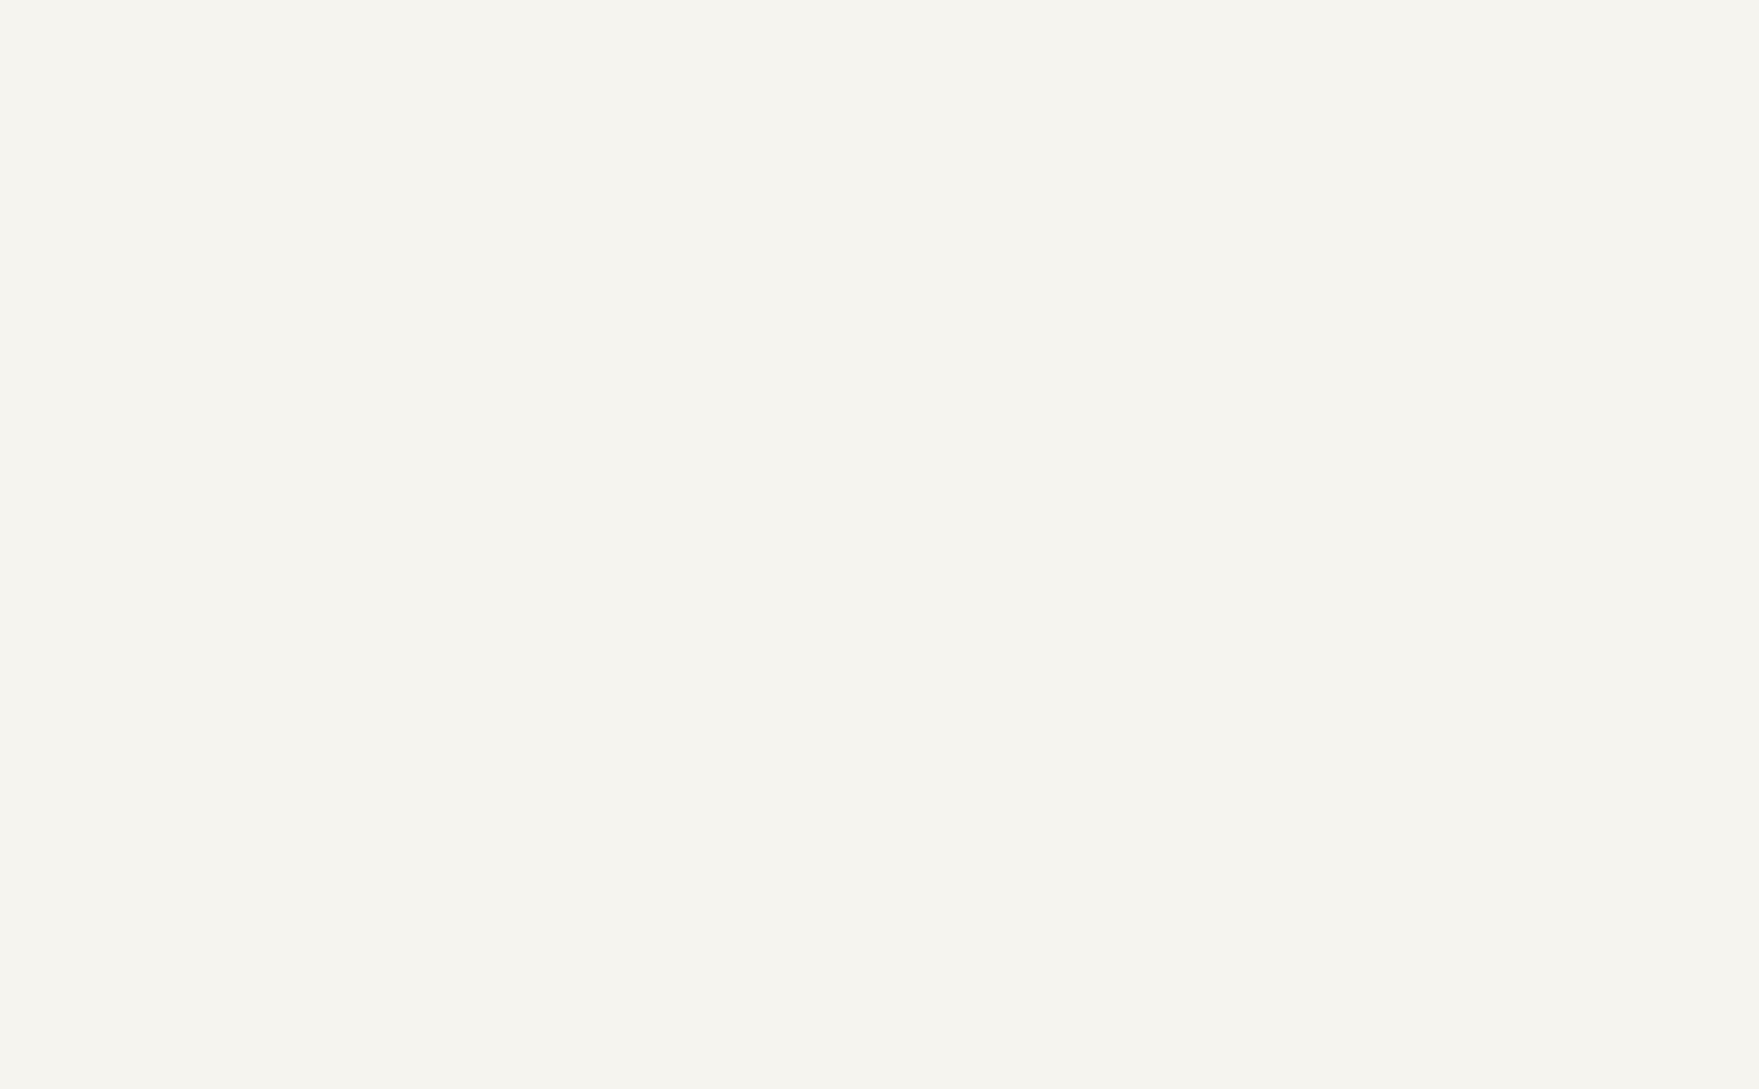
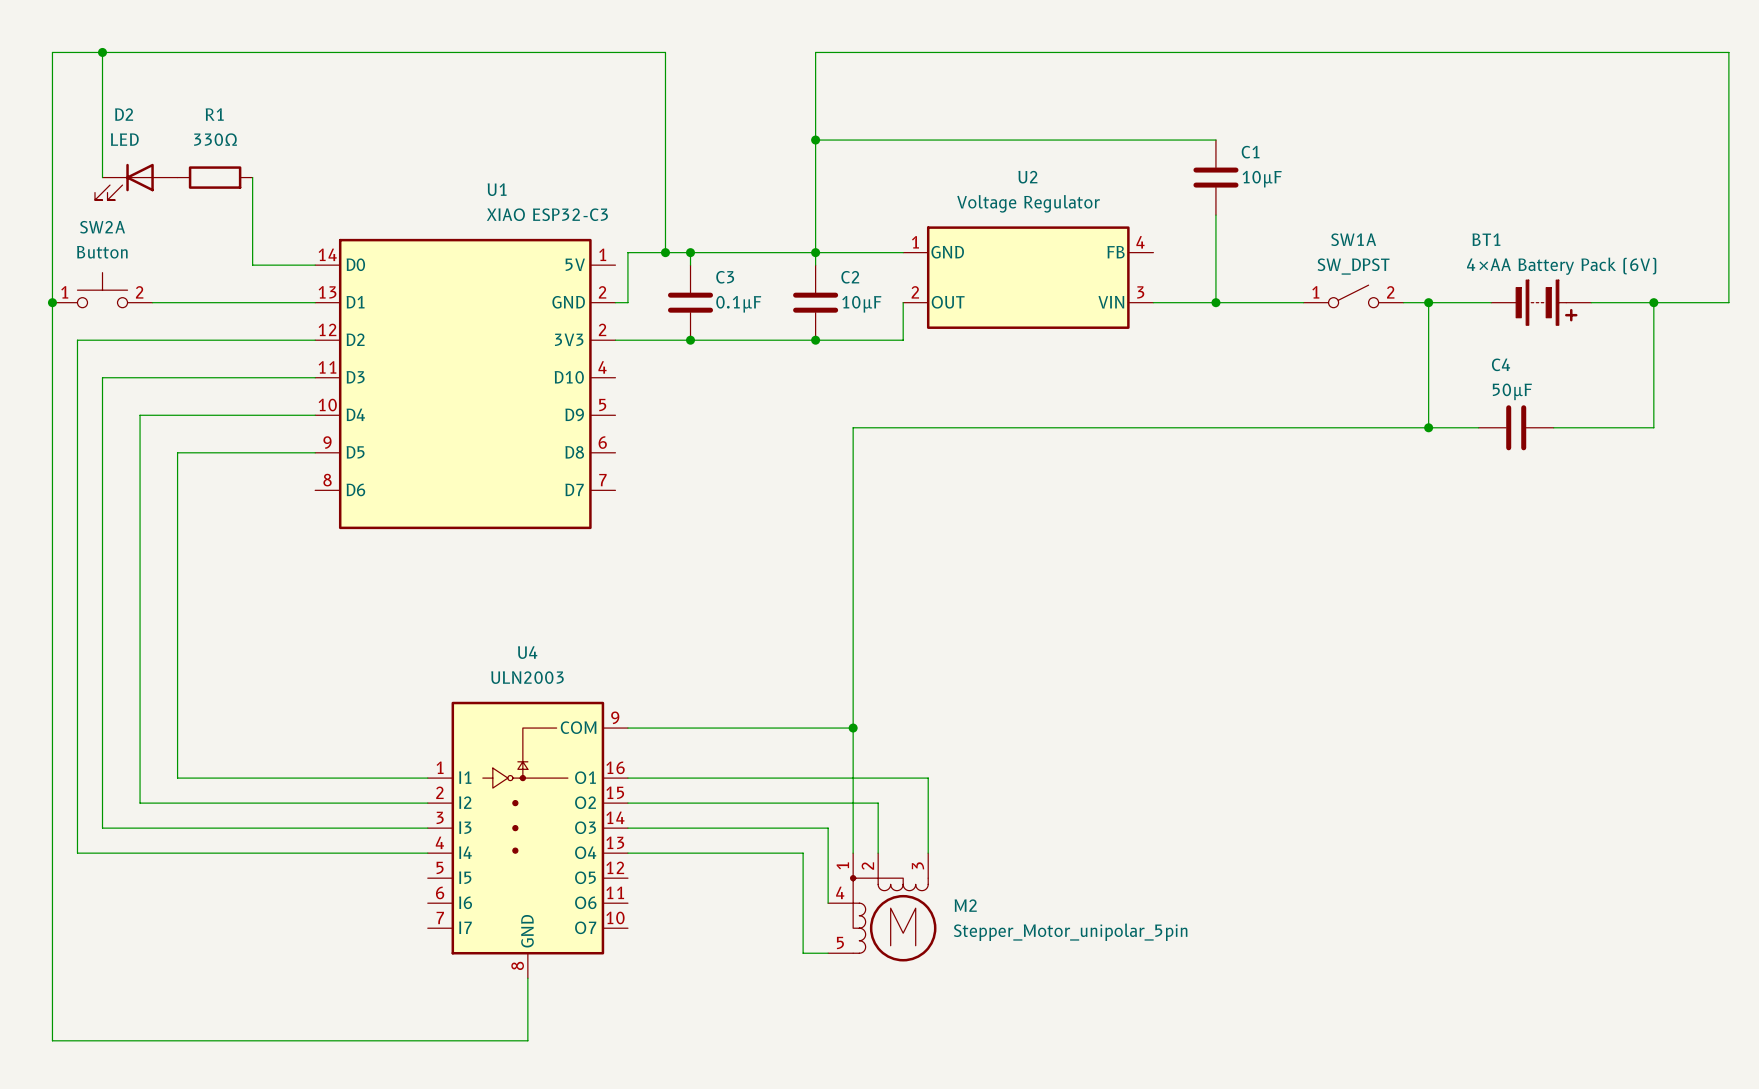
wire: none -> (102, 52) (102, 177)
junction: none -> (102, 52)
wire: none -> (815, 140) (1215, 140)
junction: none -> (815, 140)
R1: none -> 330Ω (215, 177)
wire: none -> (252, 177) (252, 265) (315, 265)
C1: none -> 10µF (1215, 177)
D2: none -> LED (136, 181)
wire: none -> (1215, 215) (1215, 302)
wire: none -> (665, 252) (665, 52) (52, 52) (52, 1040) (527, 1040) (527, 978)
junction: none -> (665, 252)
wire: none -> (690, 252) (690, 265)
junction: none -> (690, 252)
junction: none -> (815, 252)
wire: none -> (903, 252) (627, 252) (627, 302) (615, 302)
wire: none -> (815, 265) (815, 52) (1728, 52) (1728, 302) (1591, 302)
U2: none -> Voltage Regulator (1028, 277)
SW2A: none -> Button (102, 290)
SW1A: none -> SW_DPST (1353, 296)
junction: none -> (52, 302)
wire: none -> (152, 302) (315, 302)
C3: none -> 0.1µF (690, 302)
C2: none -> 10µF (815, 302)
wire: none -> (903, 302) (903, 340) (615, 340)
wire: none -> (1153, 302) (1303, 302)
junction: none -> (1215, 302)
wire: none -> (1403, 302) (1491, 302)
wire: none -> (1428, 302) (1428, 427)
junction: none -> (1428, 302)
BT1: none -> 4×AA Battery Pack (6V) (1541, 302)
wire: none -> (1653, 302) (1653, 427) (1553, 427)
junction: none -> (1653, 302)
wire: none -> (315, 340) (77, 340) (77, 853) (427, 853)
junction: none -> (690, 340)
junction: none -> (815, 340)
wire: none -> (315, 377) (102, 377) (102, 828) (427, 828)
U1: none -> XIAO ESP32-C3 (465, 383)
wire: none -> (315, 415) (140, 415) (140, 803) (427, 803)
junction: none -> (1428, 427)
wire: none -> (1478, 427) (853, 427) (853, 853)
C4: none -> 50µF (1516, 427)
wire: none -> (315, 452) (177, 452) (177, 778) (427, 778)
wire: none -> (627, 728) (853, 728)
junction: none -> (853, 728)
wire: none -> (627, 778) (928, 778) (928, 853)
wire: none -> (627, 803) (878, 803) (878, 853)
wire: none -> (627, 828) (828, 828) (828, 903)
U4: none -> ULN2003 (527, 840)
wire: none -> (627, 853) (803, 853) (803, 953) (828, 953)
M2: none -> Stepper_Motor_unipolar_5pin (882, 907)

